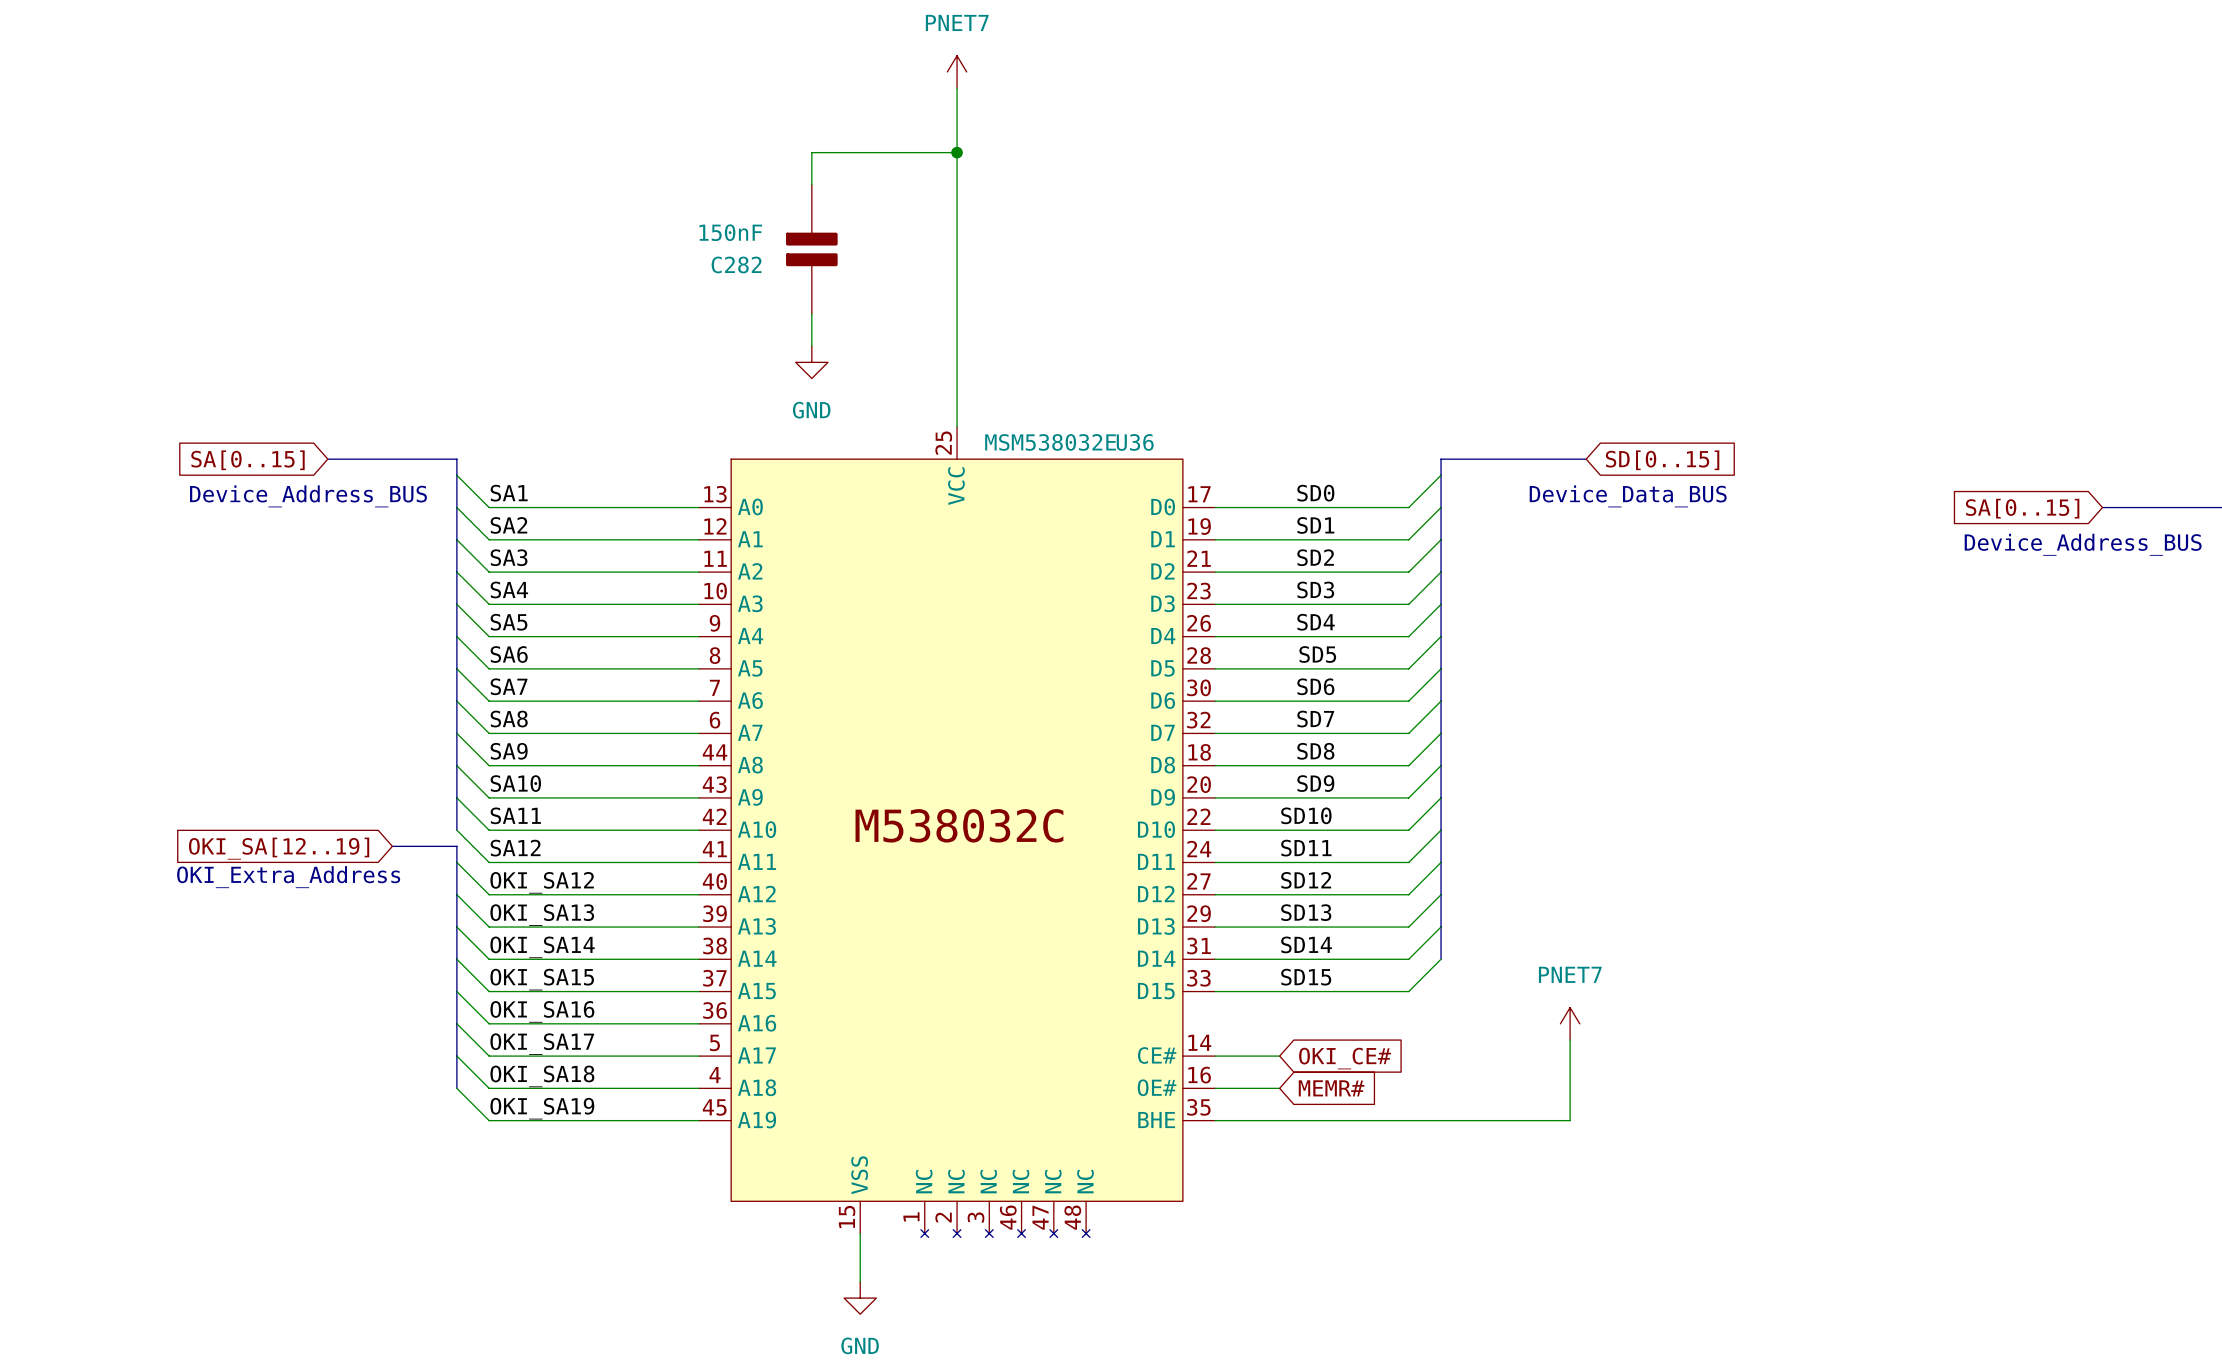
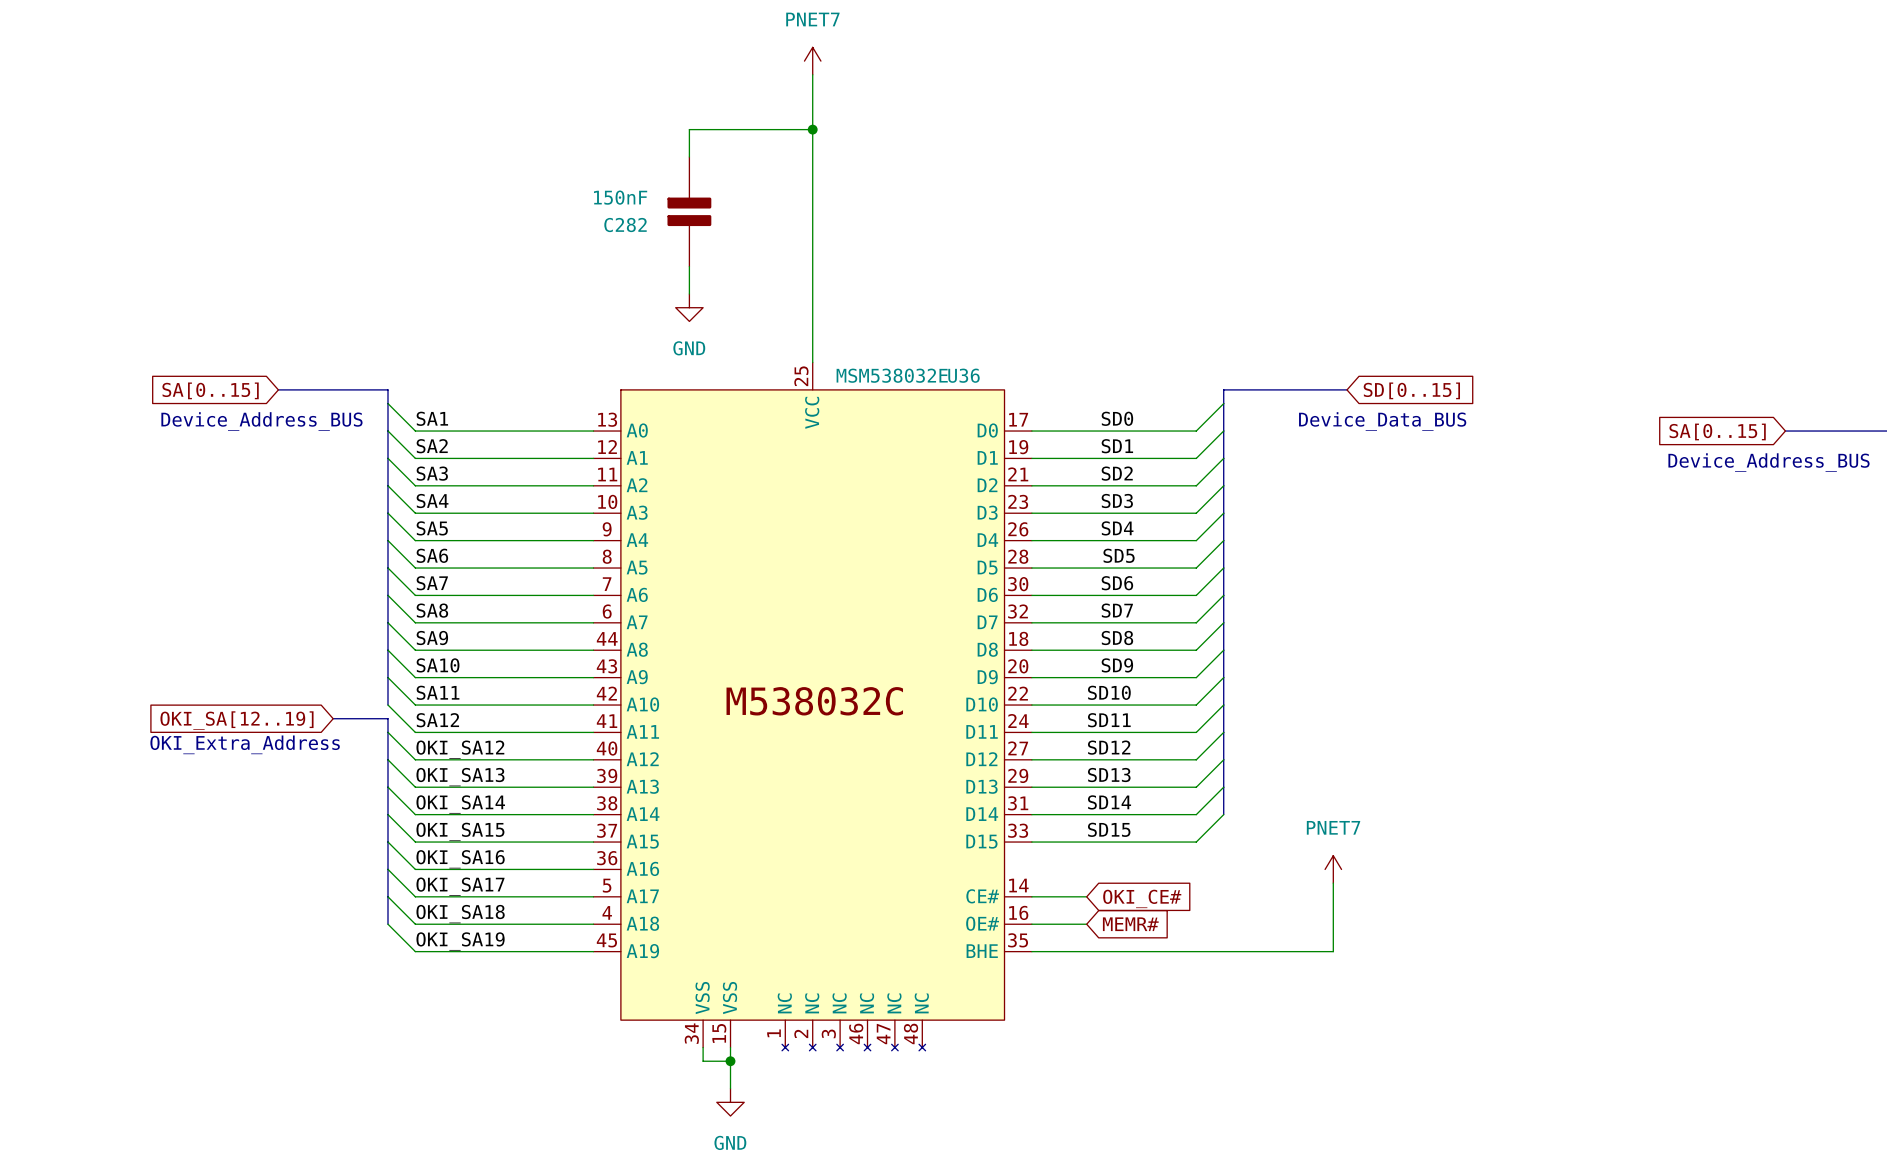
U36 symbol: [698, 426, 1216, 1238] -> [593, 362, 1032, 1051]
wire: none -> (703, 1047) (703, 1061) (730, 1061)
junction: none -> (730, 1061)

